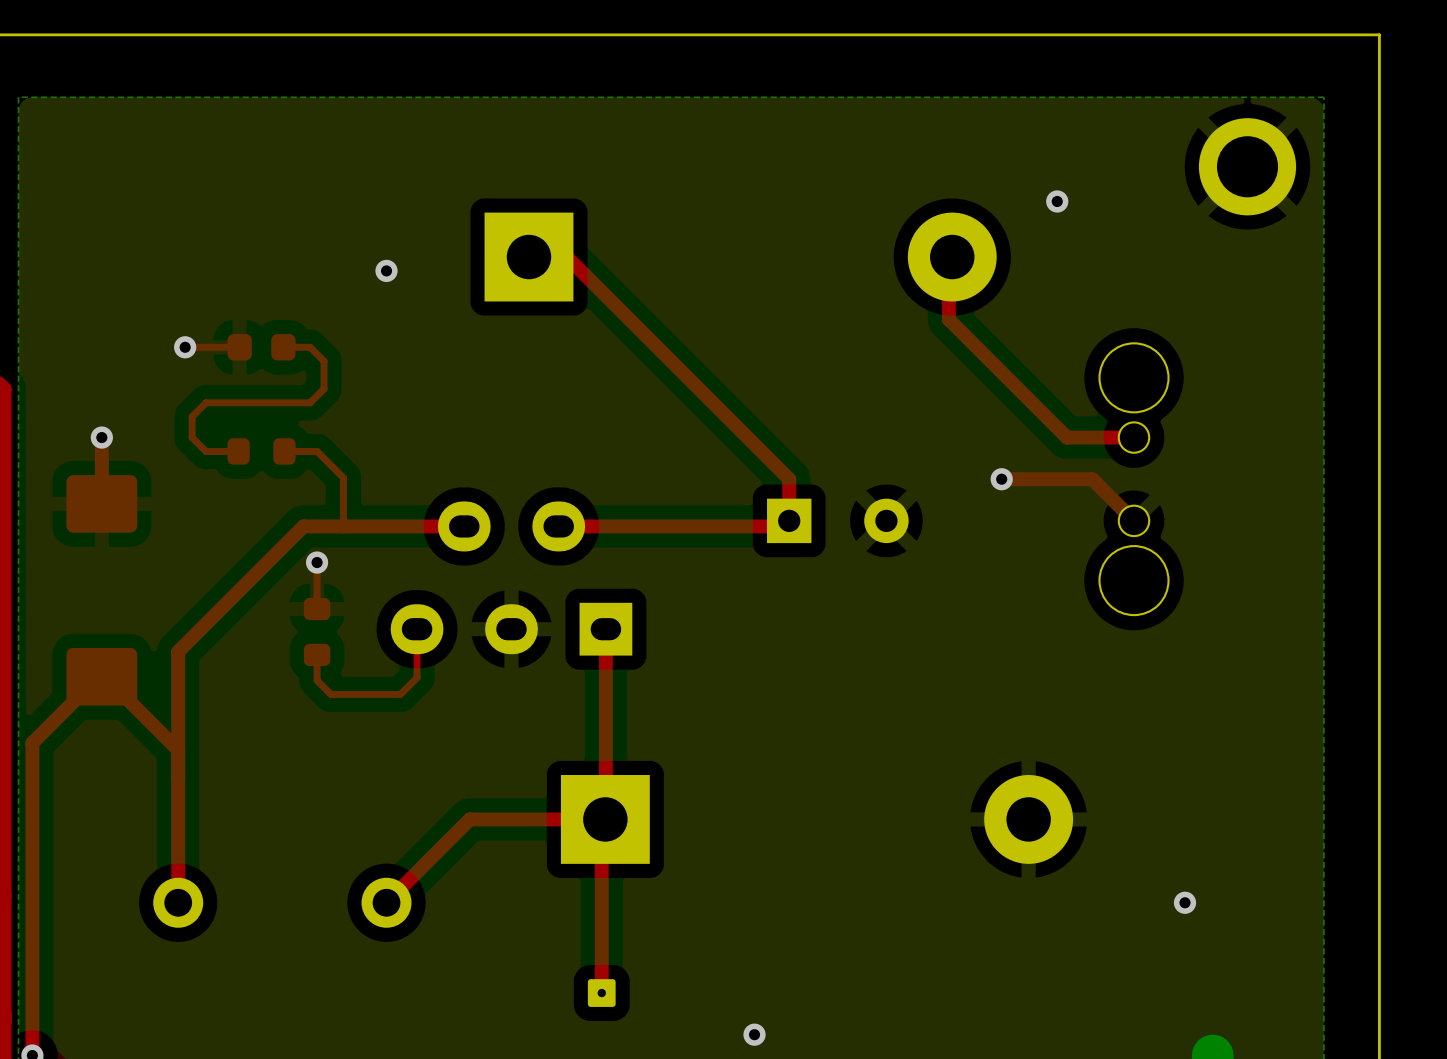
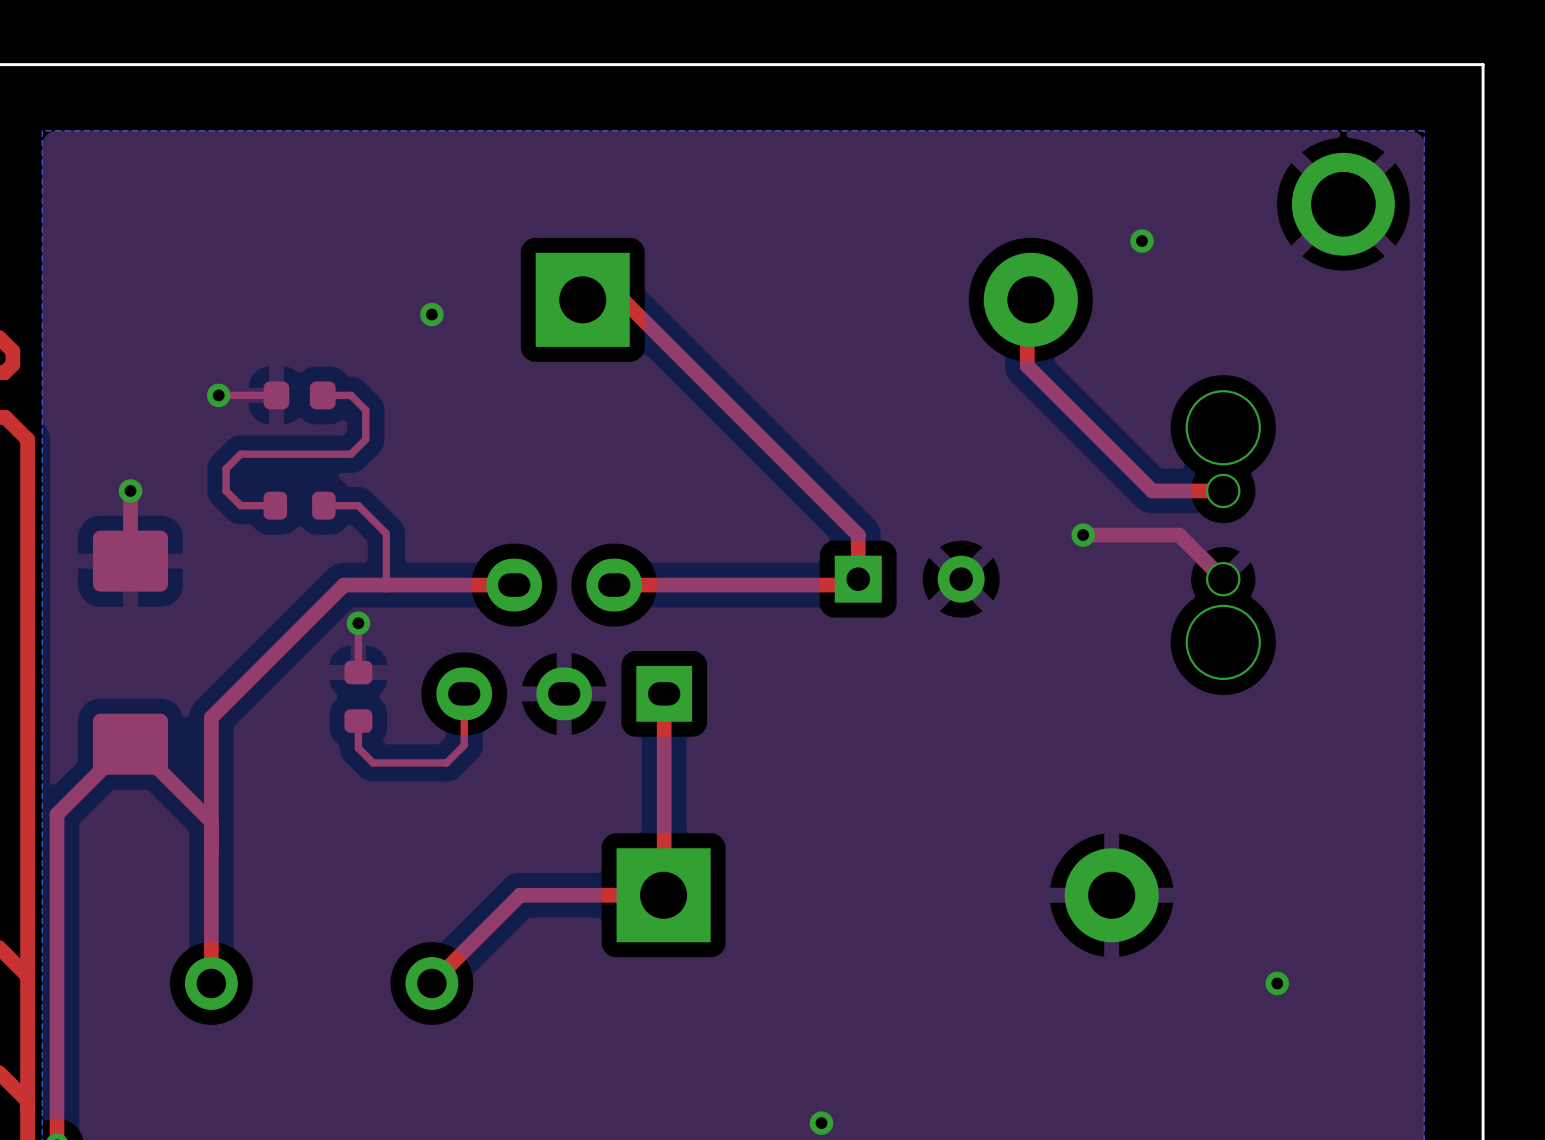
top track: (601, 826) (601, 993) -> none
part: (601, 993) -> none

